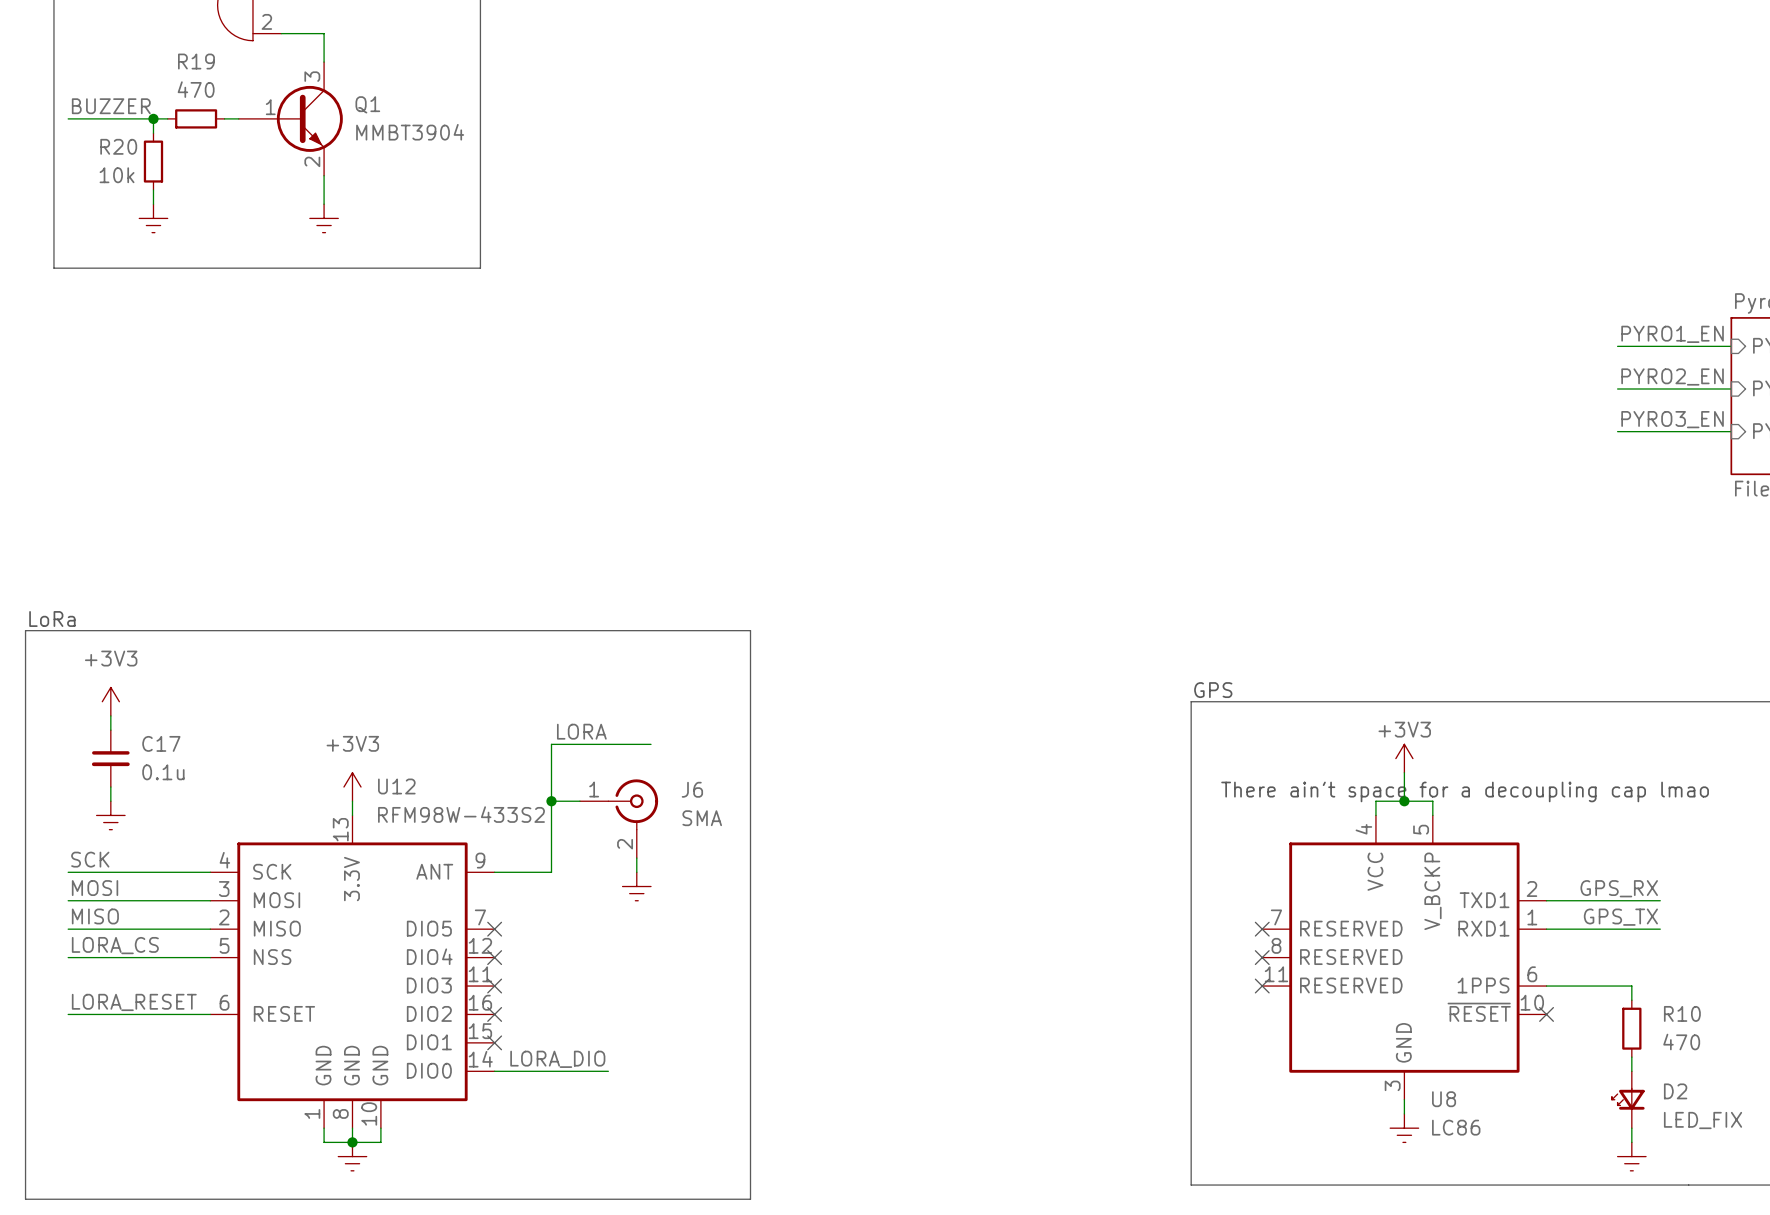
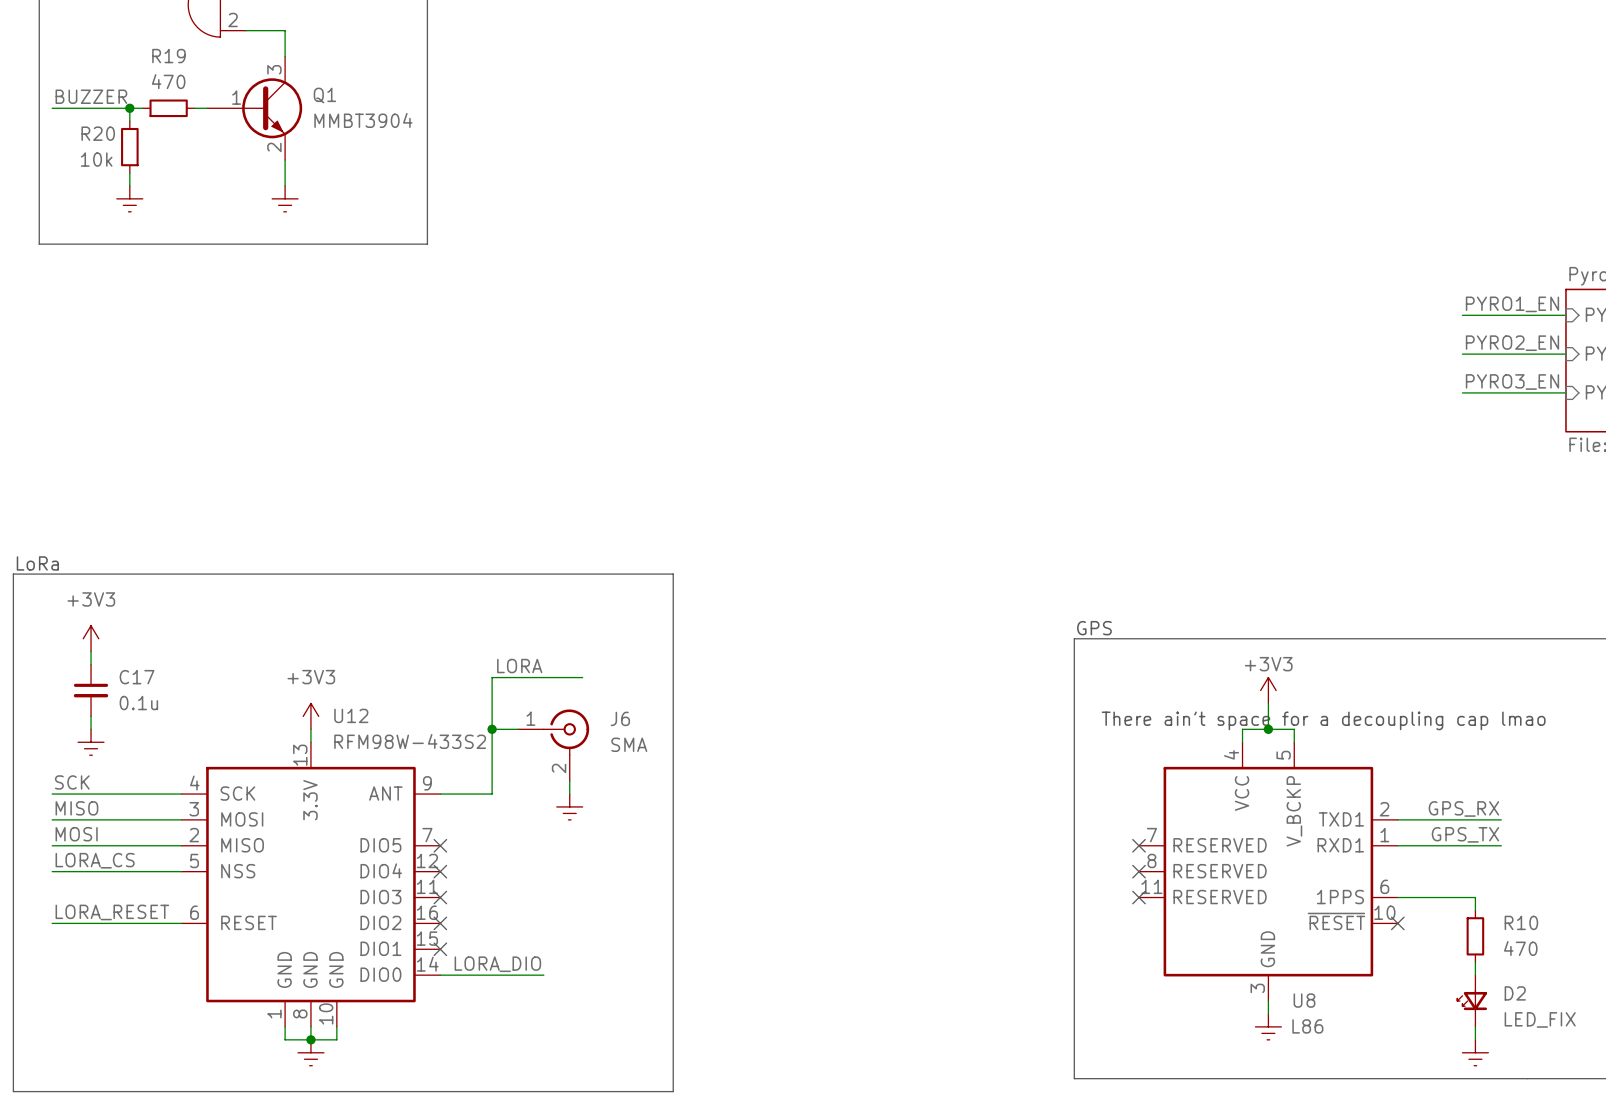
label: MOSI (95, 888) -> MISO (76, 808)
label: MISO (95, 916) -> MOSI (76, 834)
U8 value: LC86 (1456, 1127) -> L86 (1307, 1026)

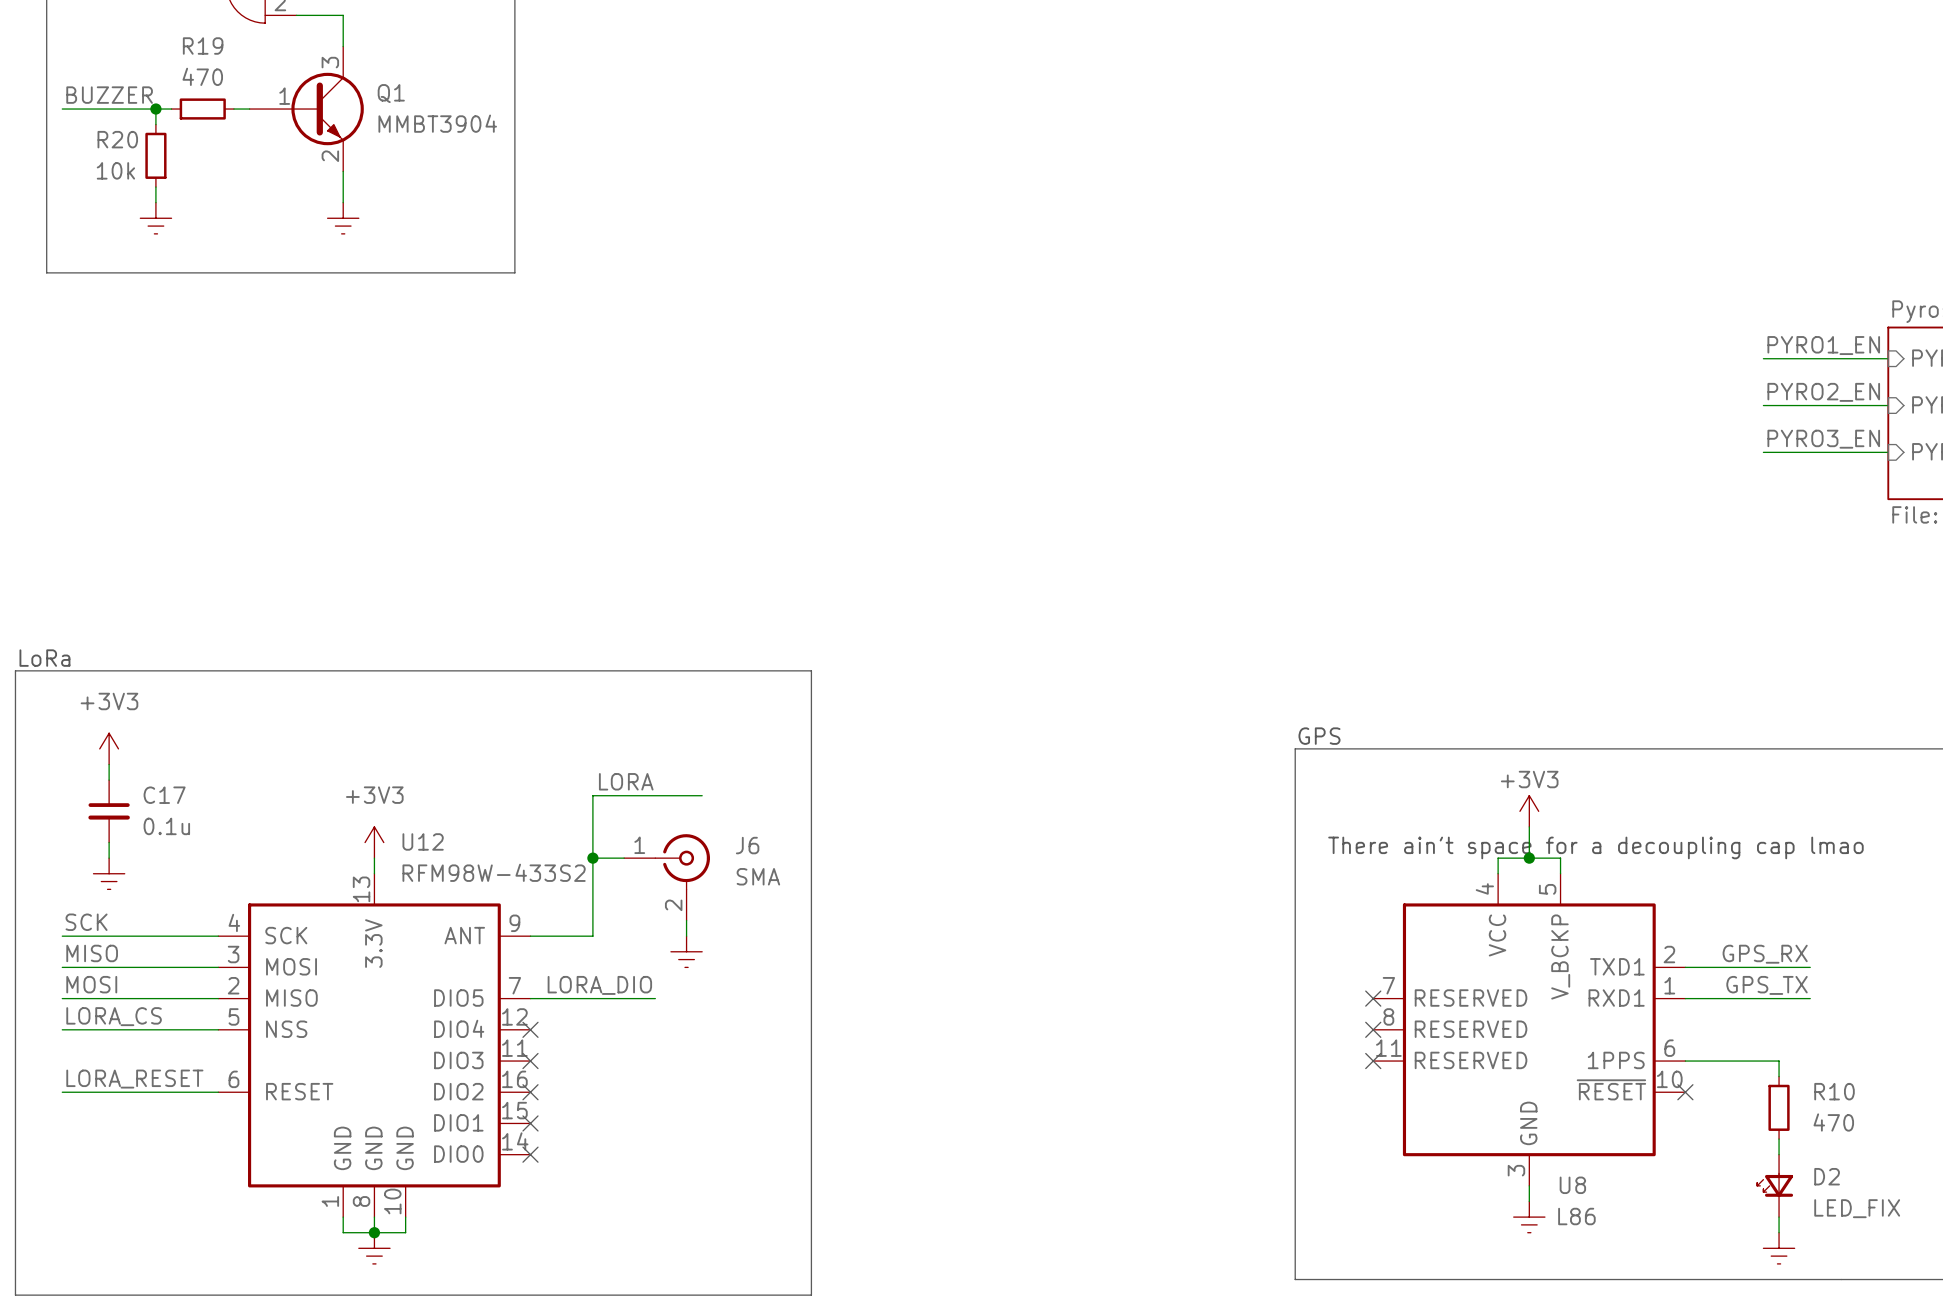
no-connect mark: (440, 845) -> none
label position: LORA_DIO (497, 964) -> LORA_DIO (599, 985)
wire: (440, 975) (543, 975) -> (530, 998) (655, 998)
no-connect mark: none -> (530, 1154)

